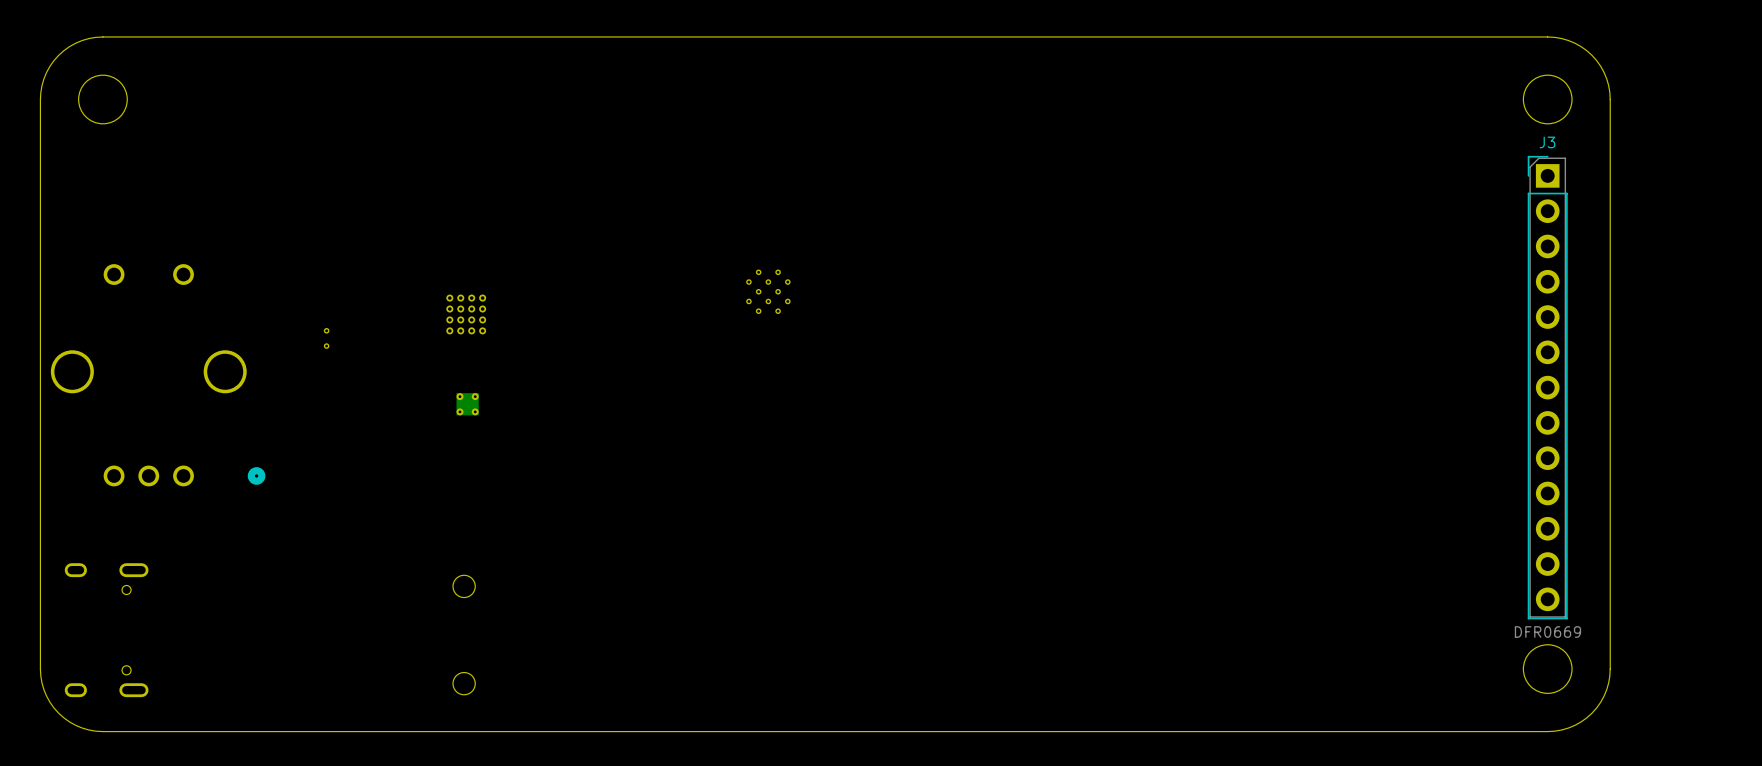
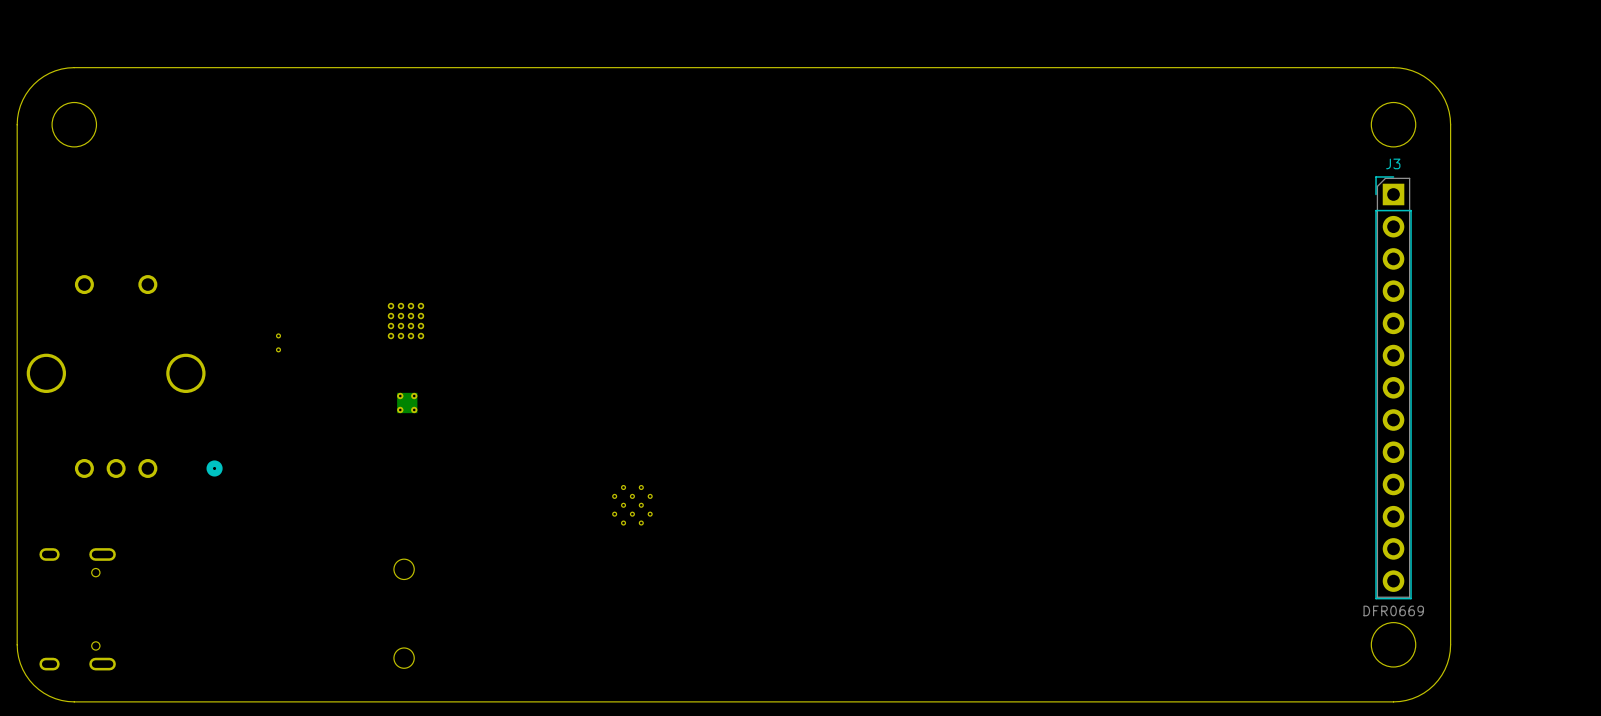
part position: (768, 291) -> (632, 505)

